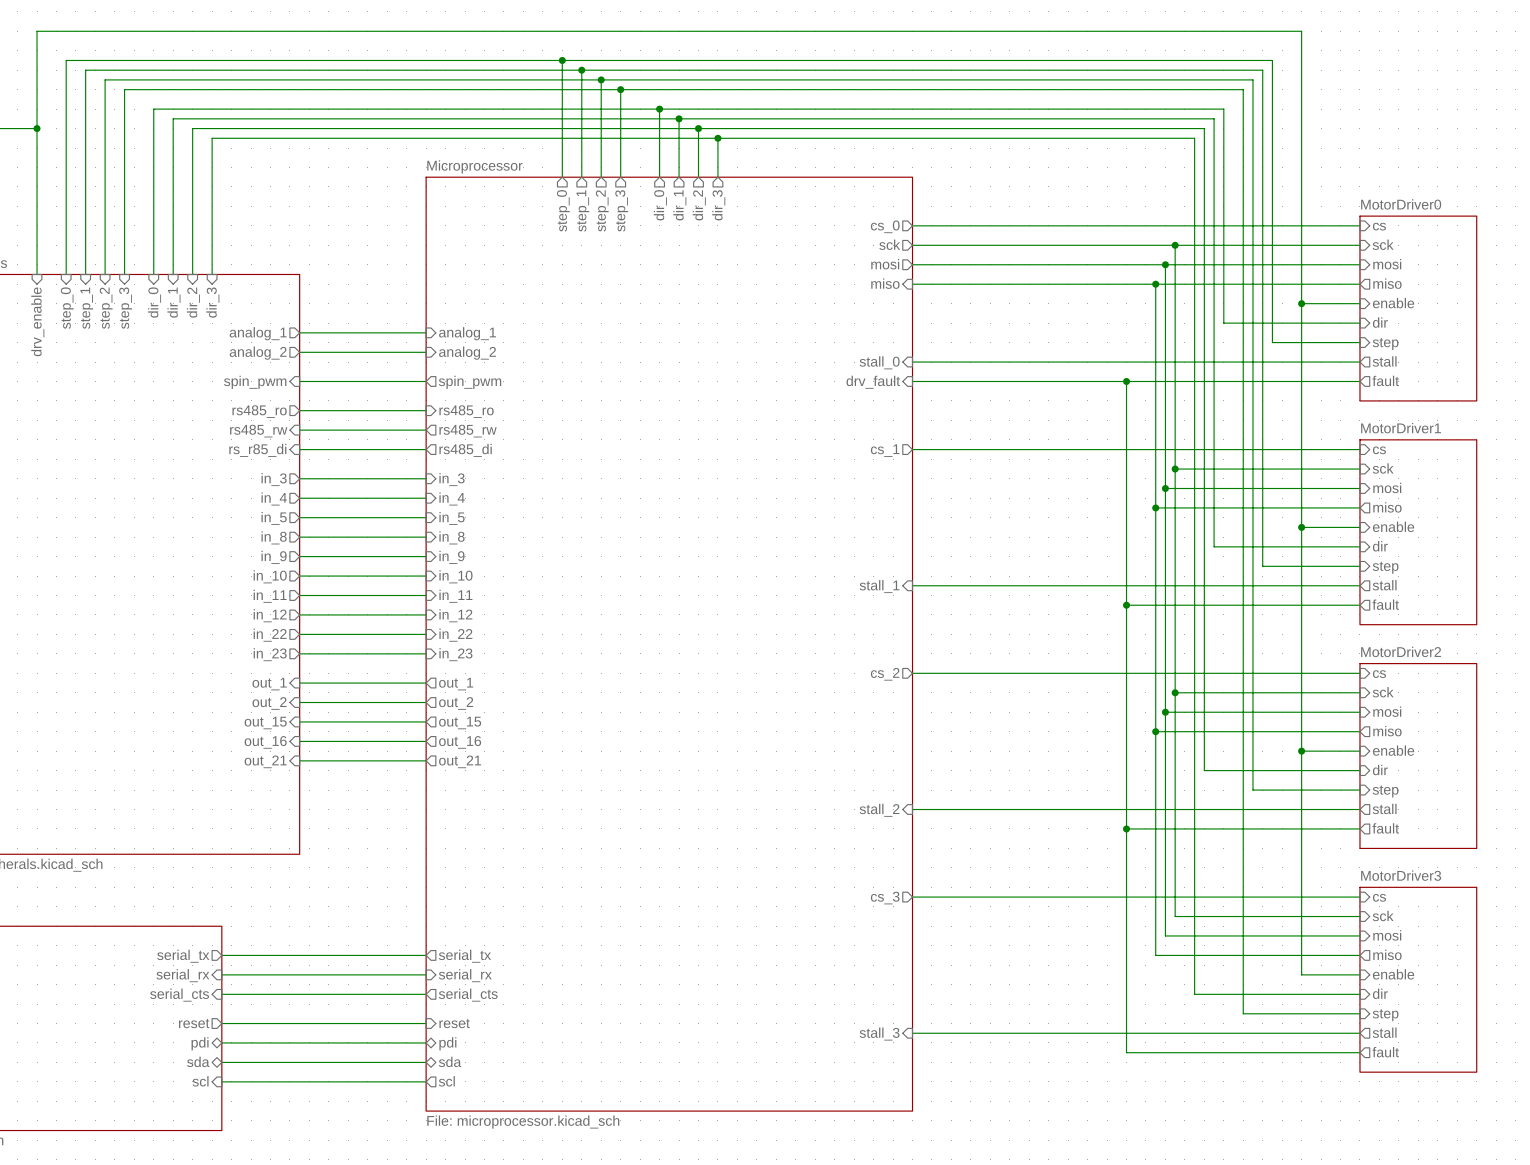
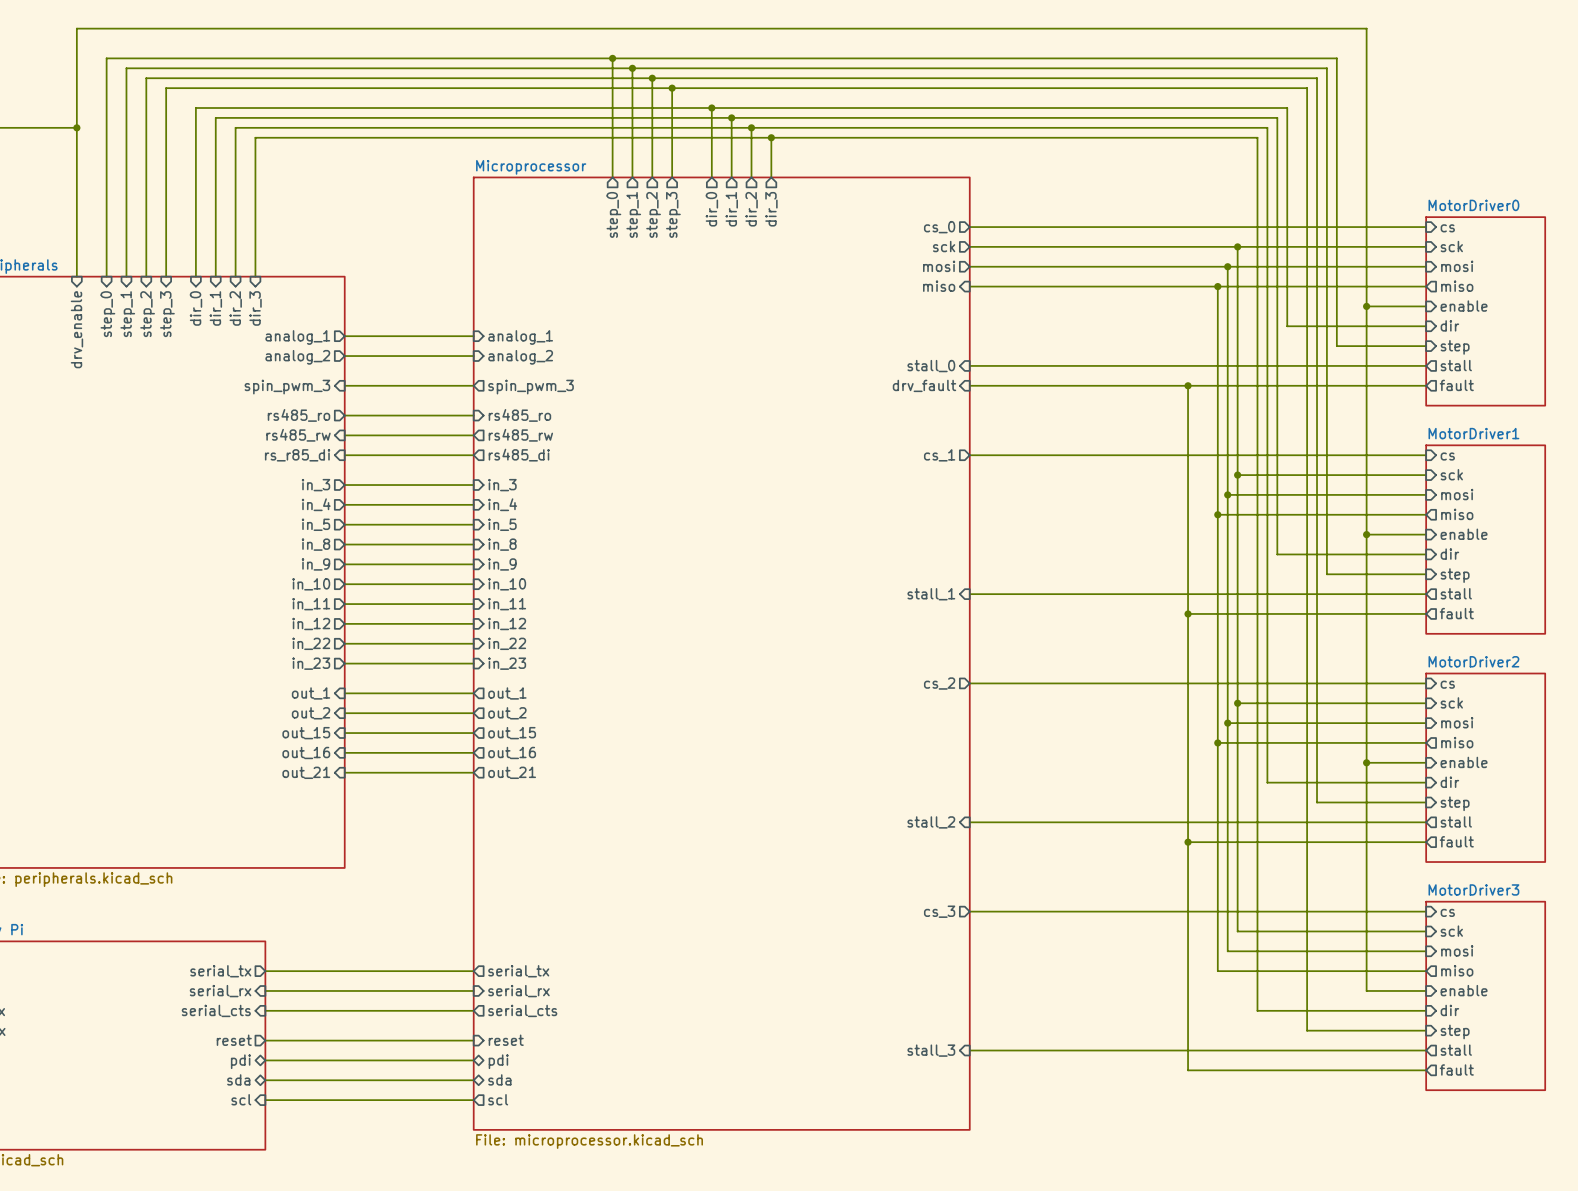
sheet pin: spin_pwm (255, 382) -> spin_pwm_3 (287, 387)
sheet pin: spin_pwm (470, 382) -> spin_pwm_3 (531, 387)

